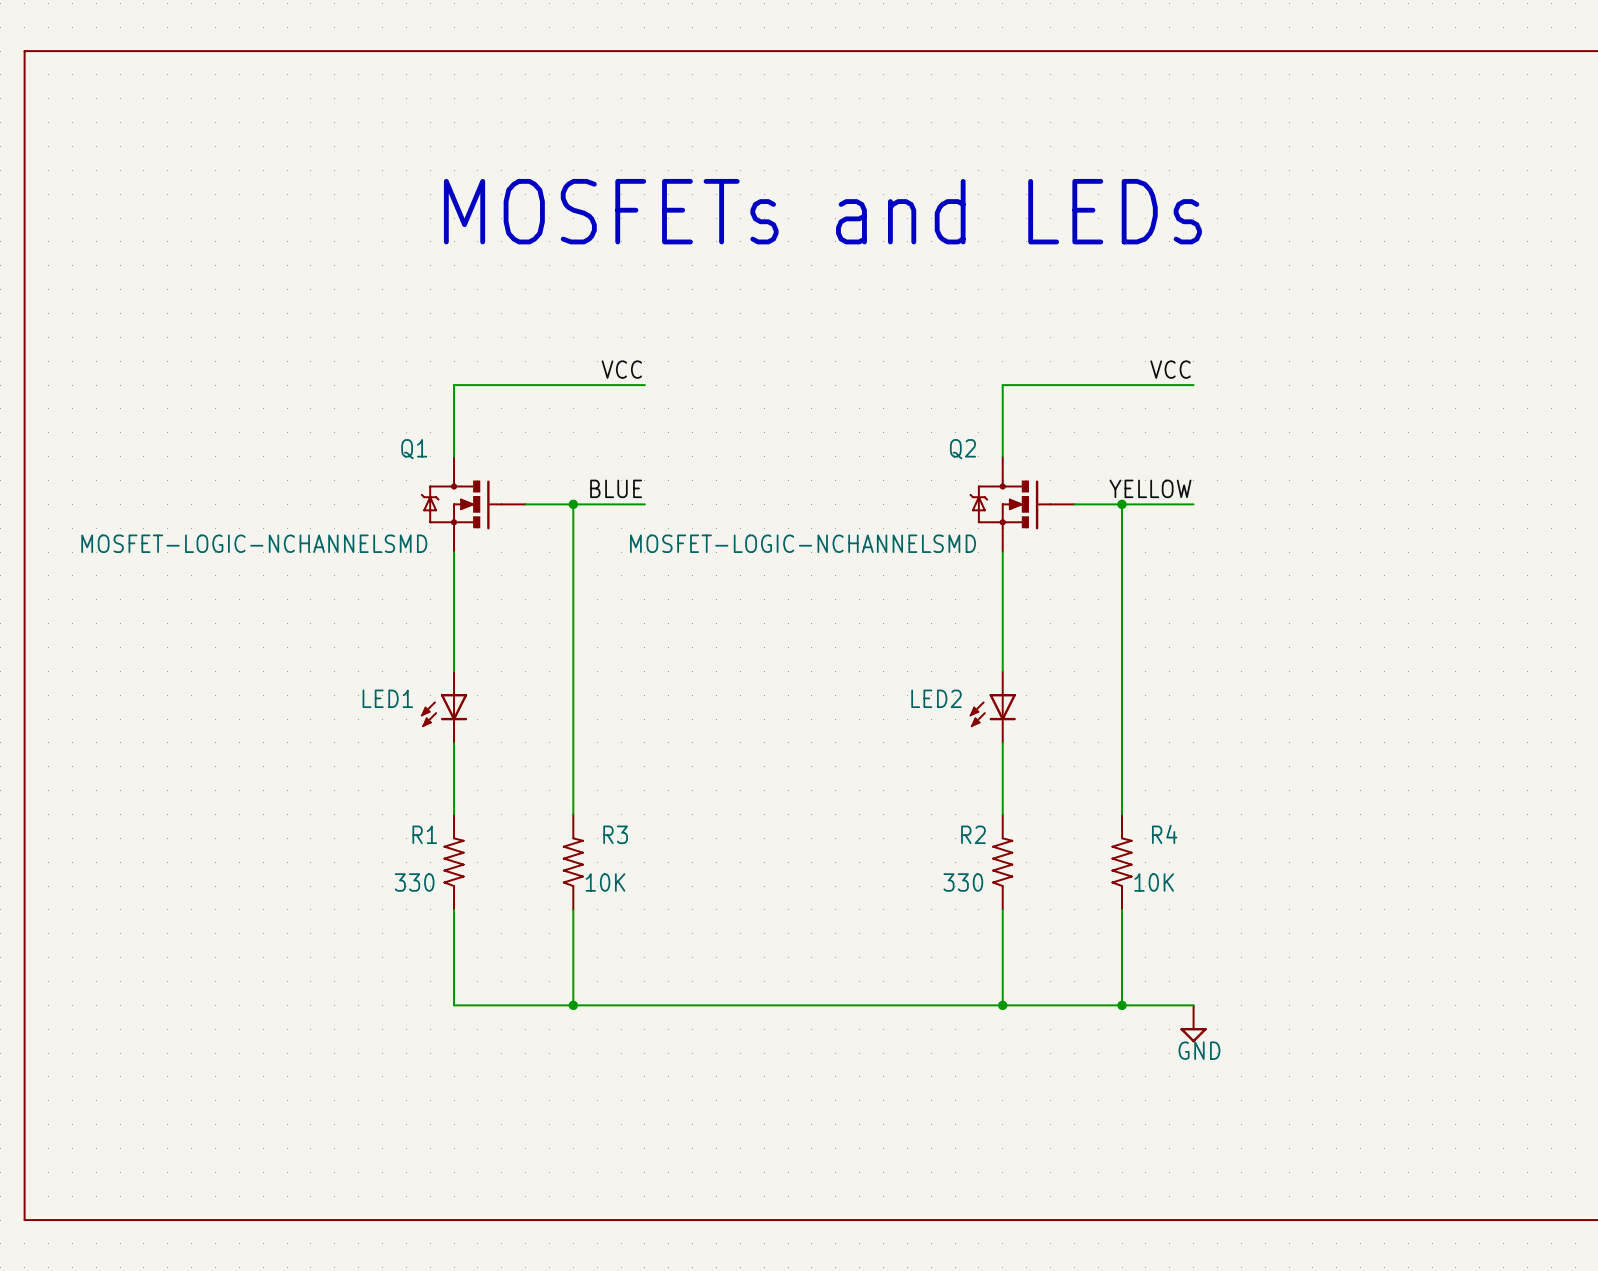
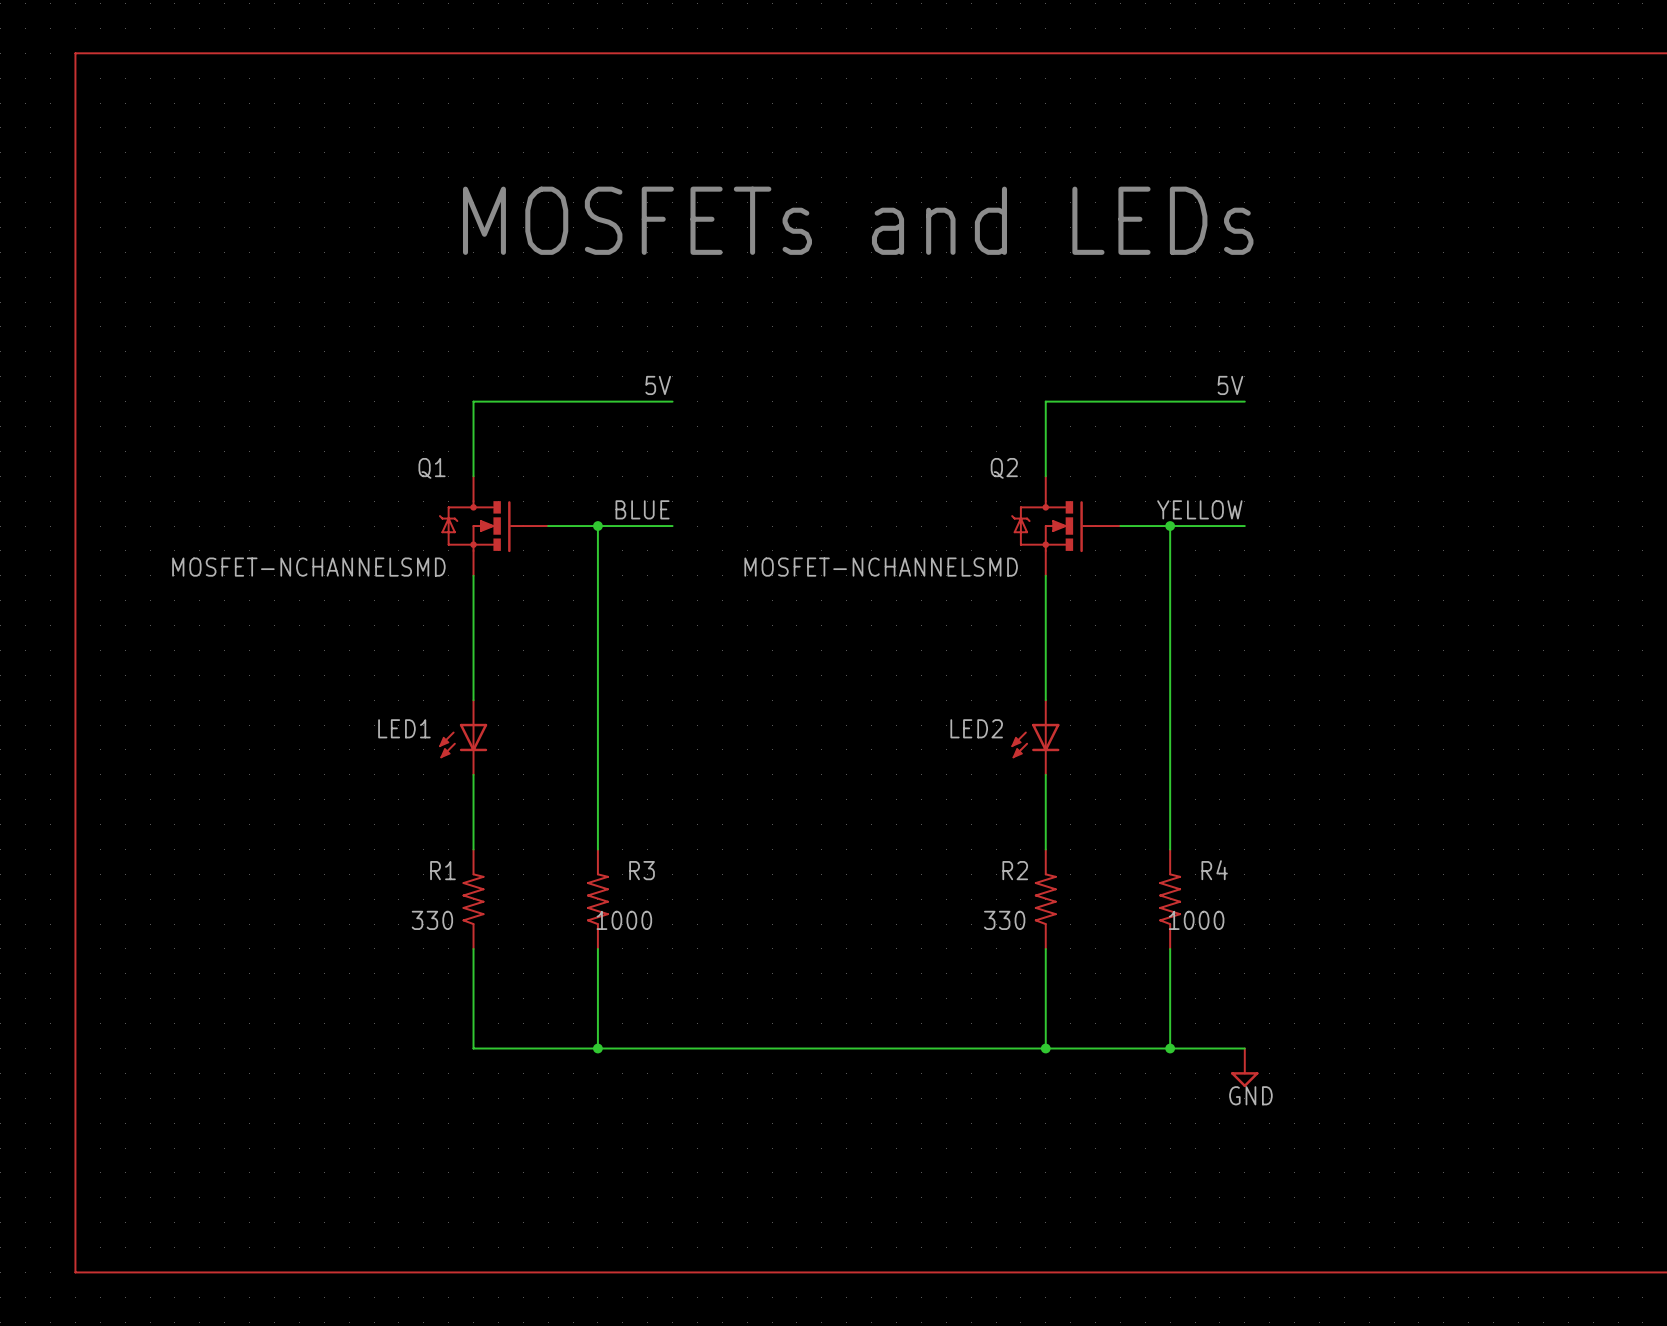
line: (72, 51) (24, 51) (24, 1220) (72, 1220) -> (75, 53) (75, 1272)
label: VCC (621, 369) -> 5V (658, 385)
label: VCC (1170, 369) -> 5V (1230, 385)
Q1 value: MOSFET-LOGIC-NCHANNELSMD (254, 543) -> MOSFET-NCHANNELSMD (308, 567)
Q2 value: MOSFET-LOGIC-NCHANNELSMD (803, 543) -> MOSFET-NCHANNELSMD (881, 567)
R3 value: 10K (605, 882) -> 1000 (624, 920)
R4 value: 10K (1154, 882) -> 1000 (1196, 920)

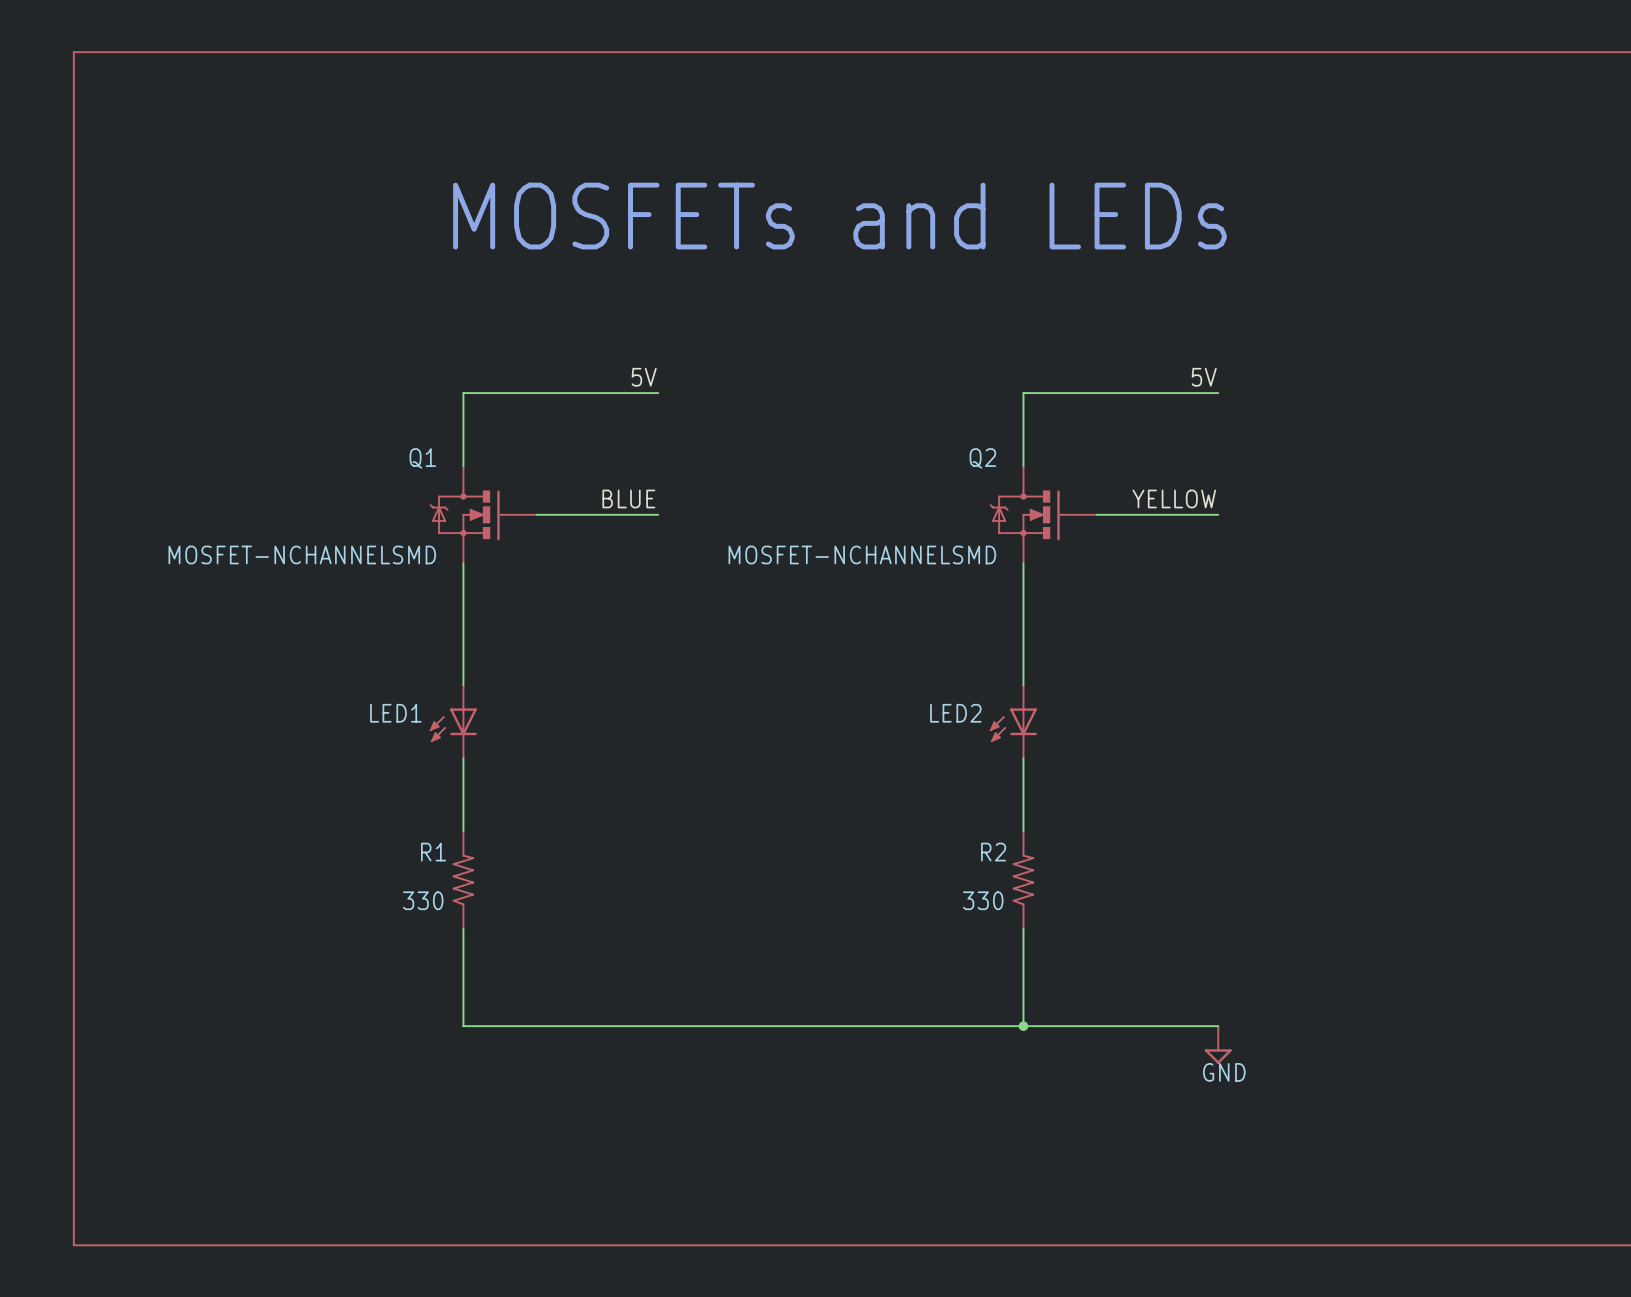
wire: (597, 526) (597, 849) -> none
junction: (597, 526) -> none
wire: (1170, 526) (1170, 849) -> none
junction: (1170, 526) -> none
R3: 1000 (597, 899) -> none
R4: 1000 (1170, 899) -> none
wire: (597, 948) (597, 1048) -> none
wire: (1170, 948) (1170, 1048) -> none
junction: (597, 1048) -> none
junction: (1170, 1048) -> none

